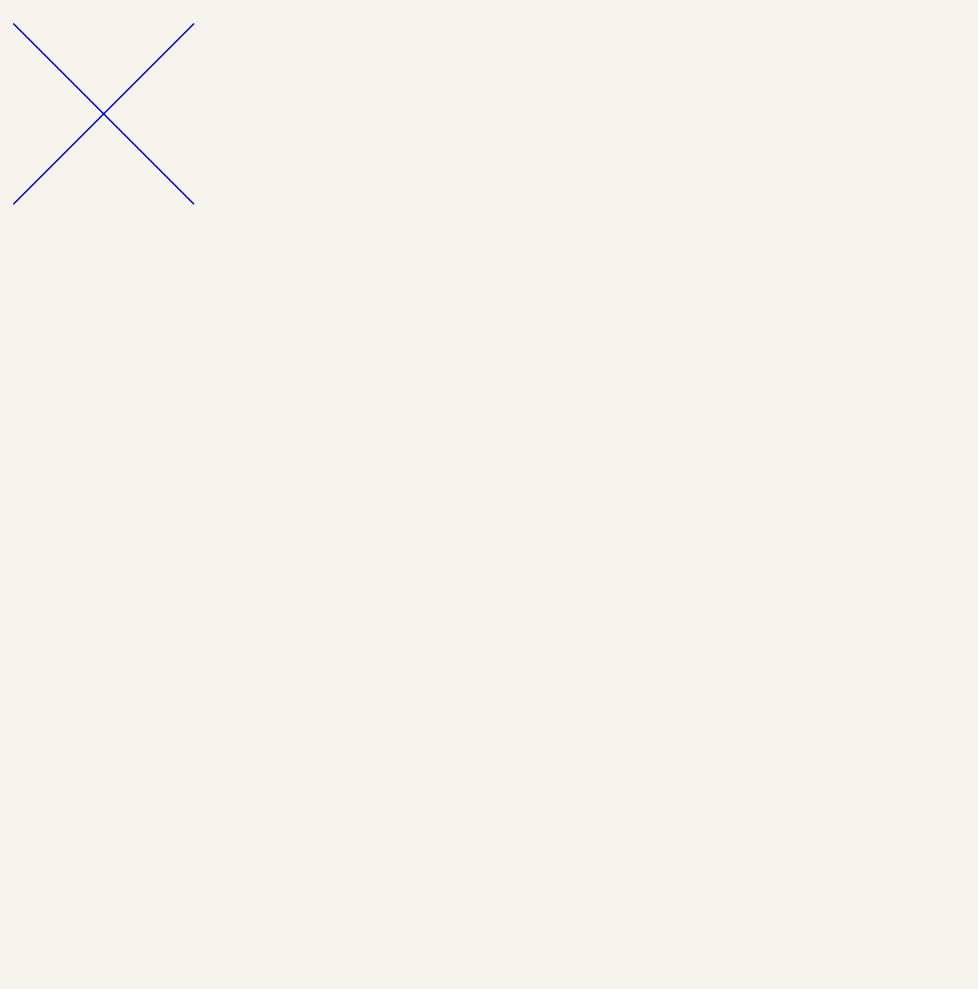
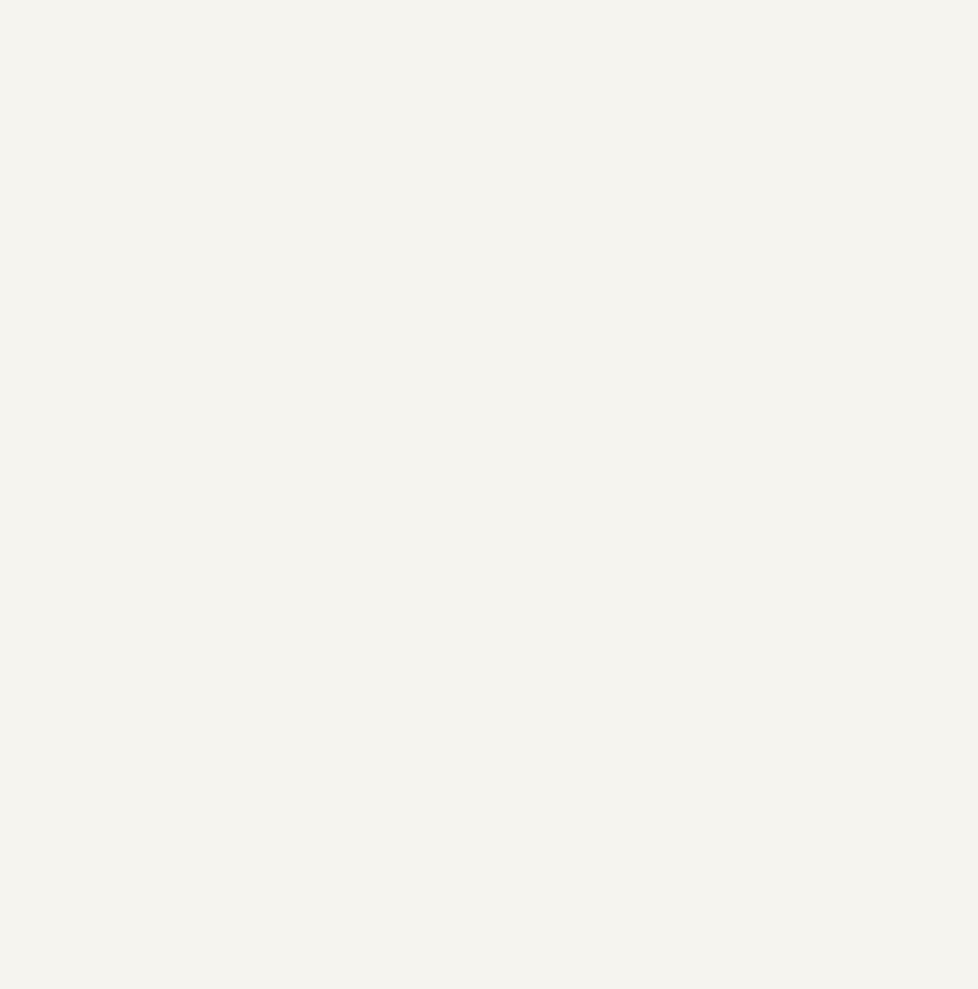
no-connect mark: (103, 113) -> none

